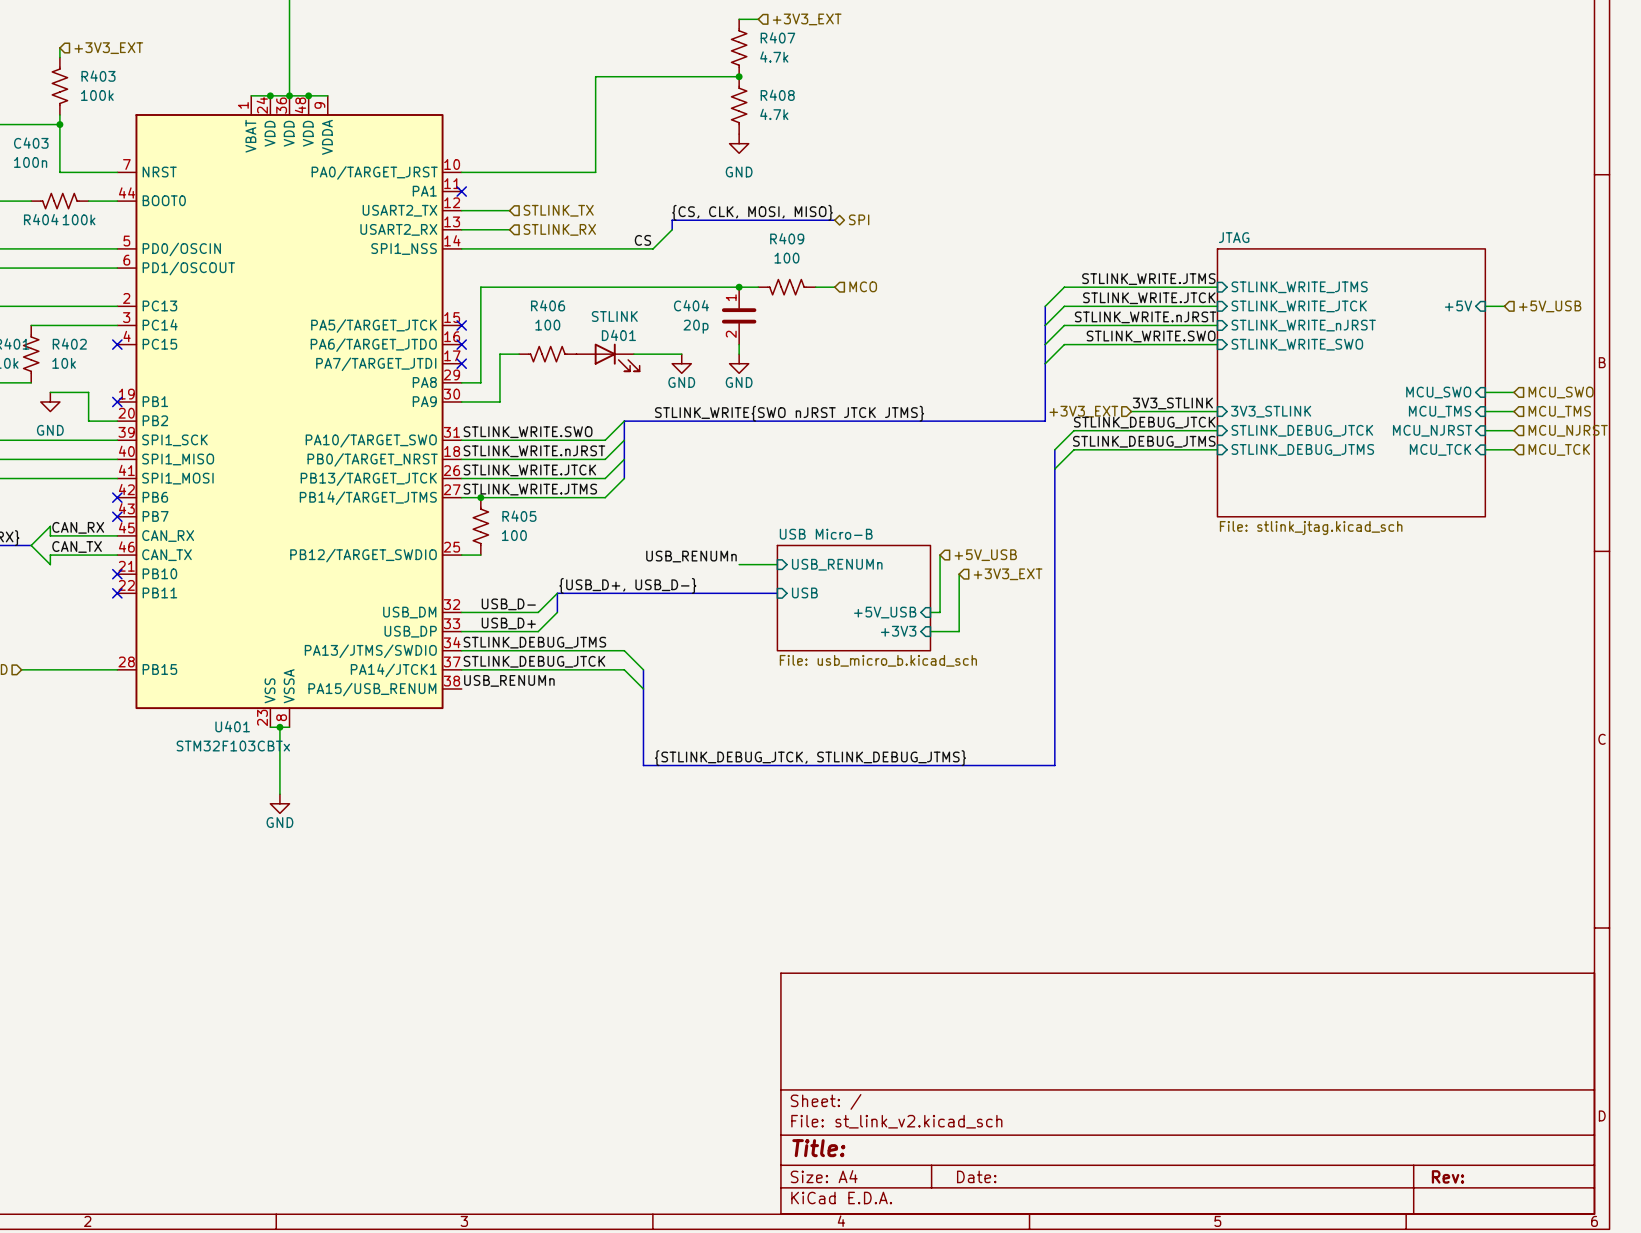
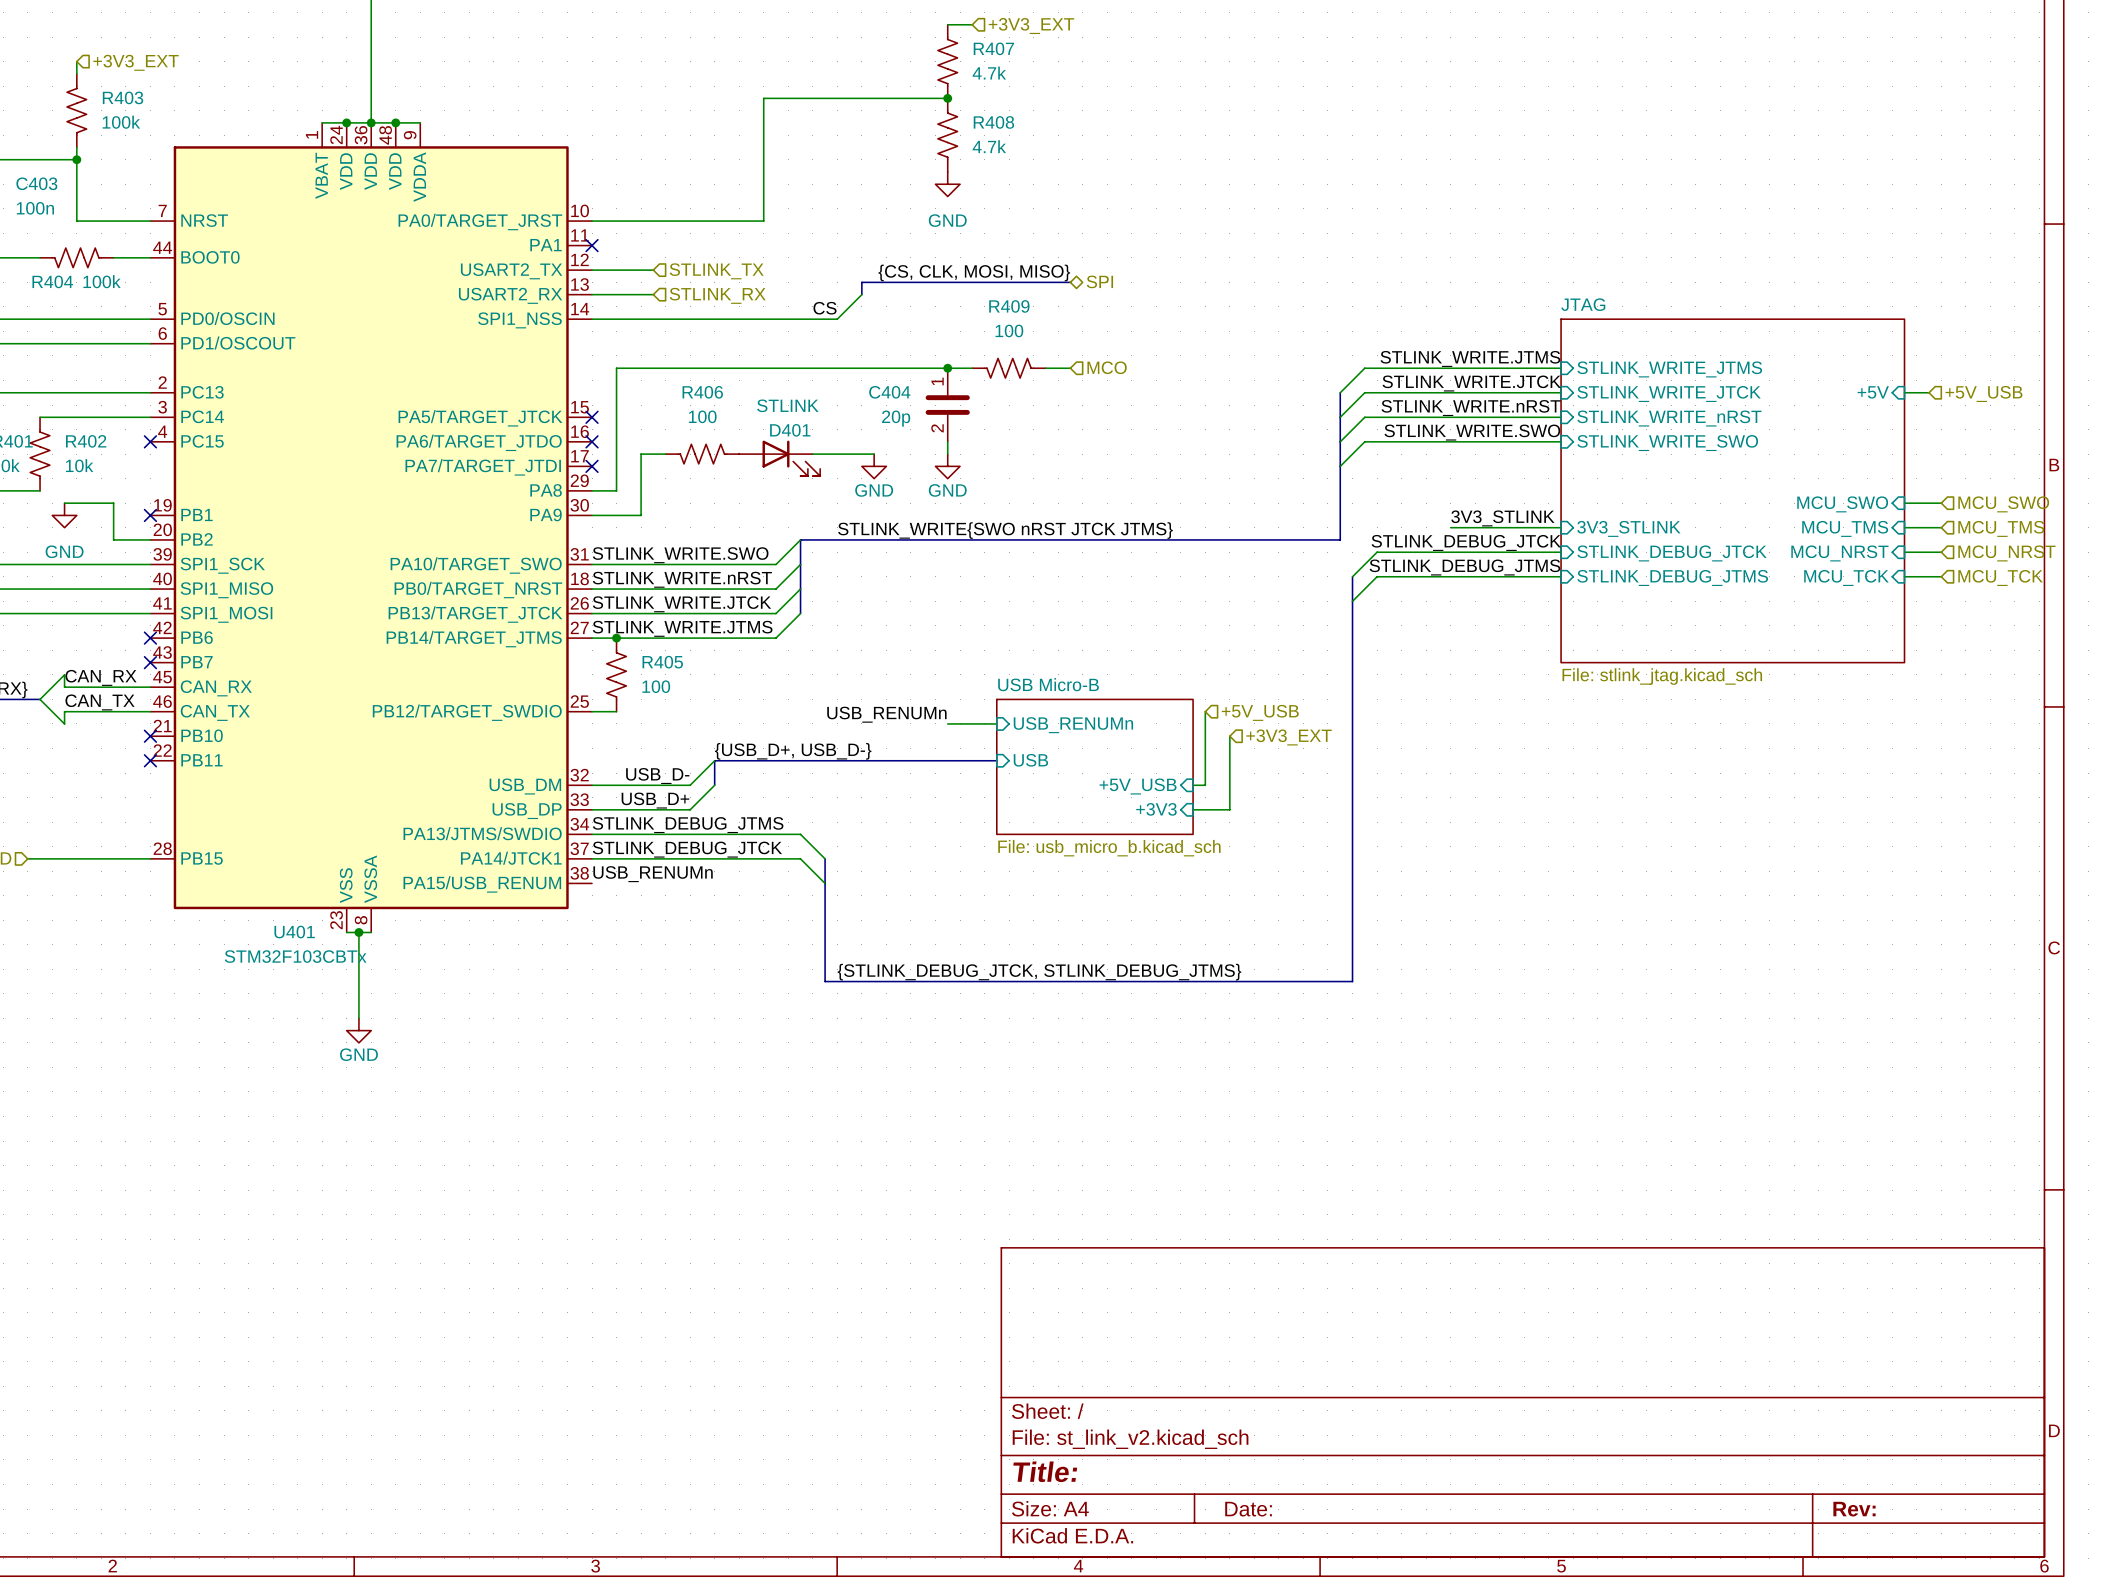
label: STLINK_WRITE.nJRST (1145, 317) -> STLINK_WRITE.nRST (1471, 408)
sheet pin: STLINK_WRITE_nJRST (1303, 325) -> STLINK_WRITE_nRST (1669, 418)
hierarchical label: +3V3_EXT (1083, 411) -> none
label: STLINK_WRITE{SWO nJRST JTCK JTMS} (789, 413) -> STLINK_WRITE{SWO nRST JTCK JTMS} (1005, 530)
sheet pin: MCU_NJRST (1432, 430) -> MCU_NRST (1839, 553)
hierarchical label: MCU_NJRST (1568, 430) -> MCU_NRST (2006, 553)
label: STLINK_WRITE.nJRST (534, 451) -> STLINK_WRITE.nRST (682, 579)

